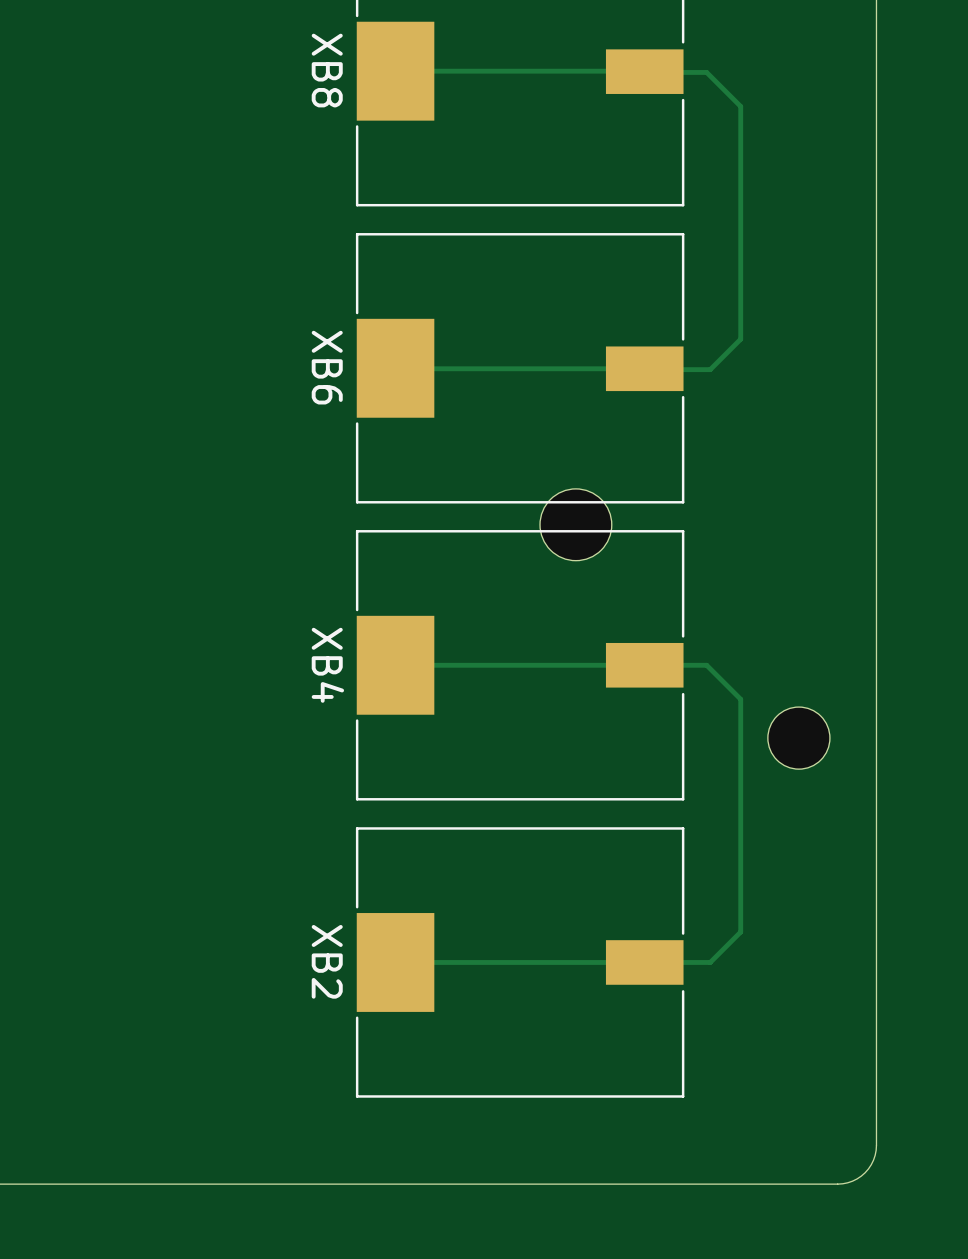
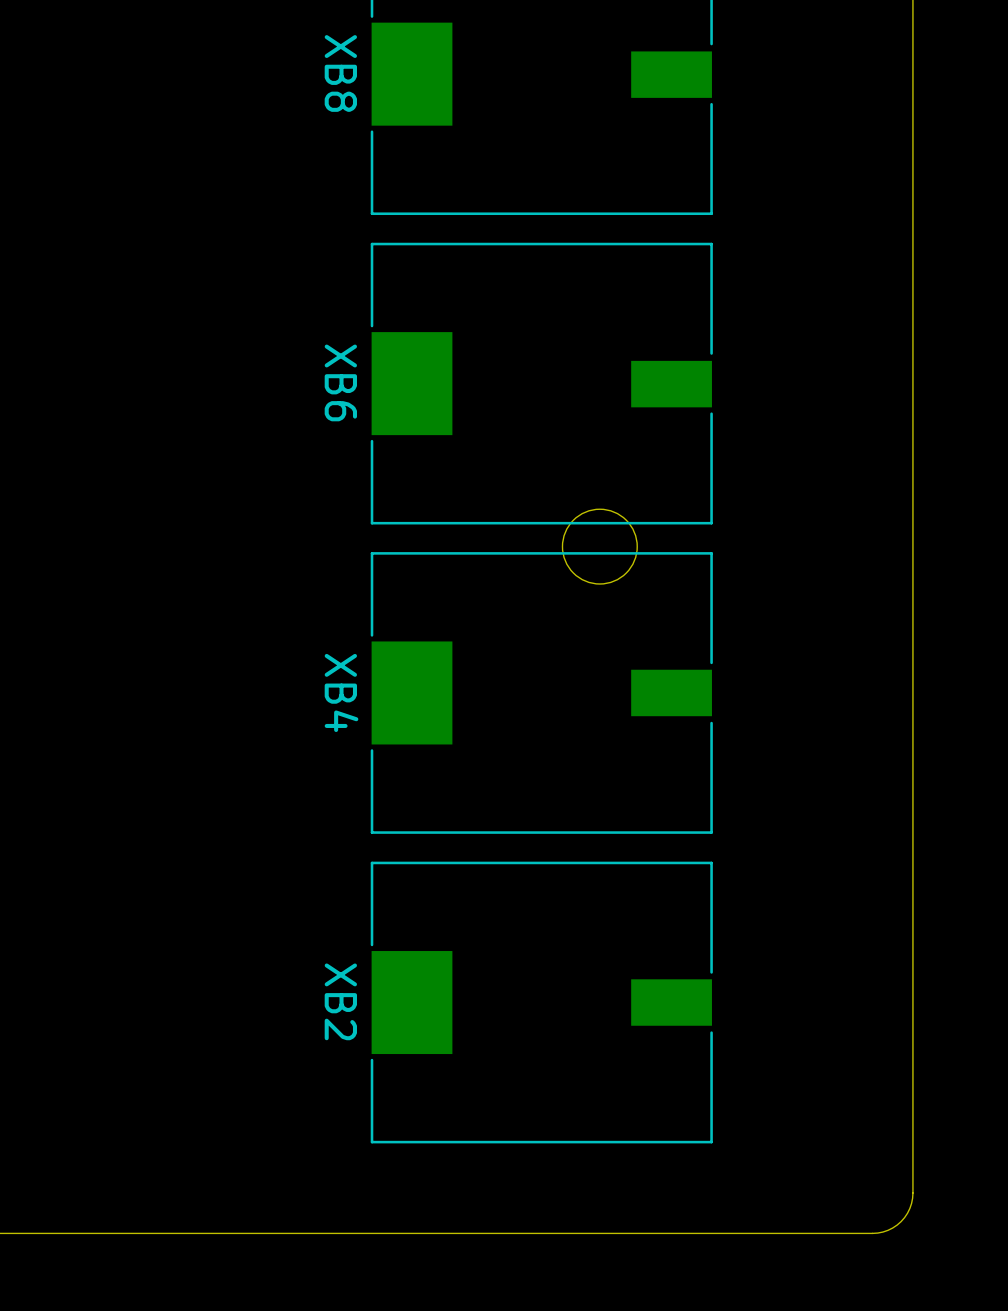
track: (395, 71) (644, 71) -> none
track: (644, 72) (706, 72) (740, 106) (740, 339) (710, 369) (644, 369) -> none
track: (395, 368) (644, 368) -> none
track: (395, 665) (706, 665) (740, 699) (740, 932) (710, 962) (395, 962) -> none
part: (798, 738) -> none

